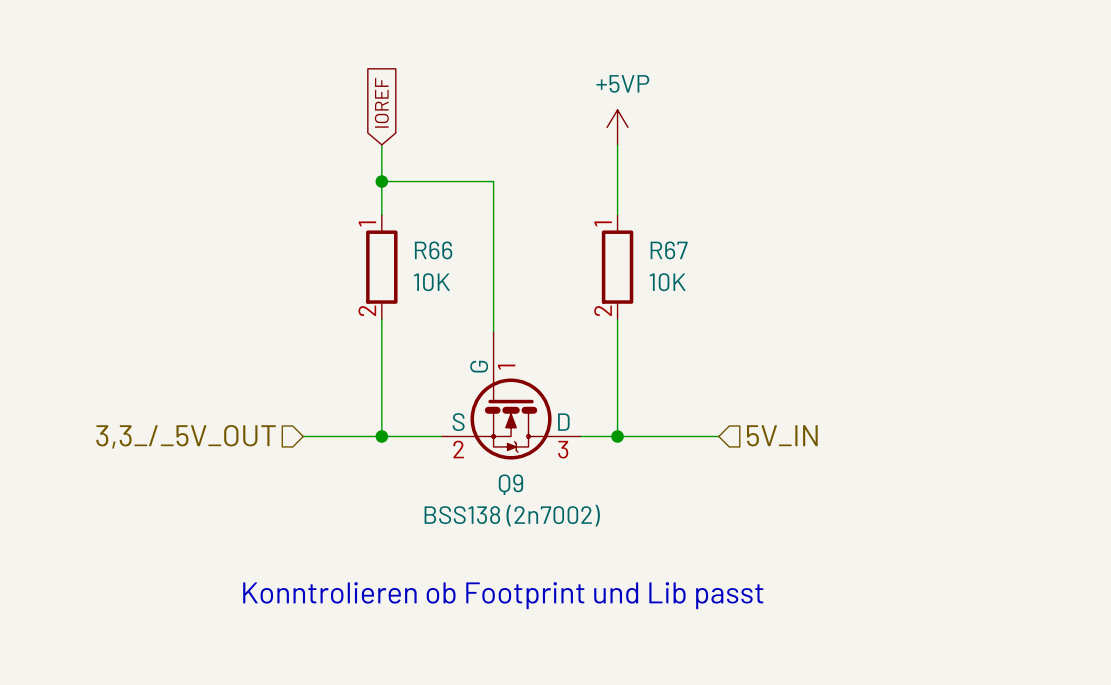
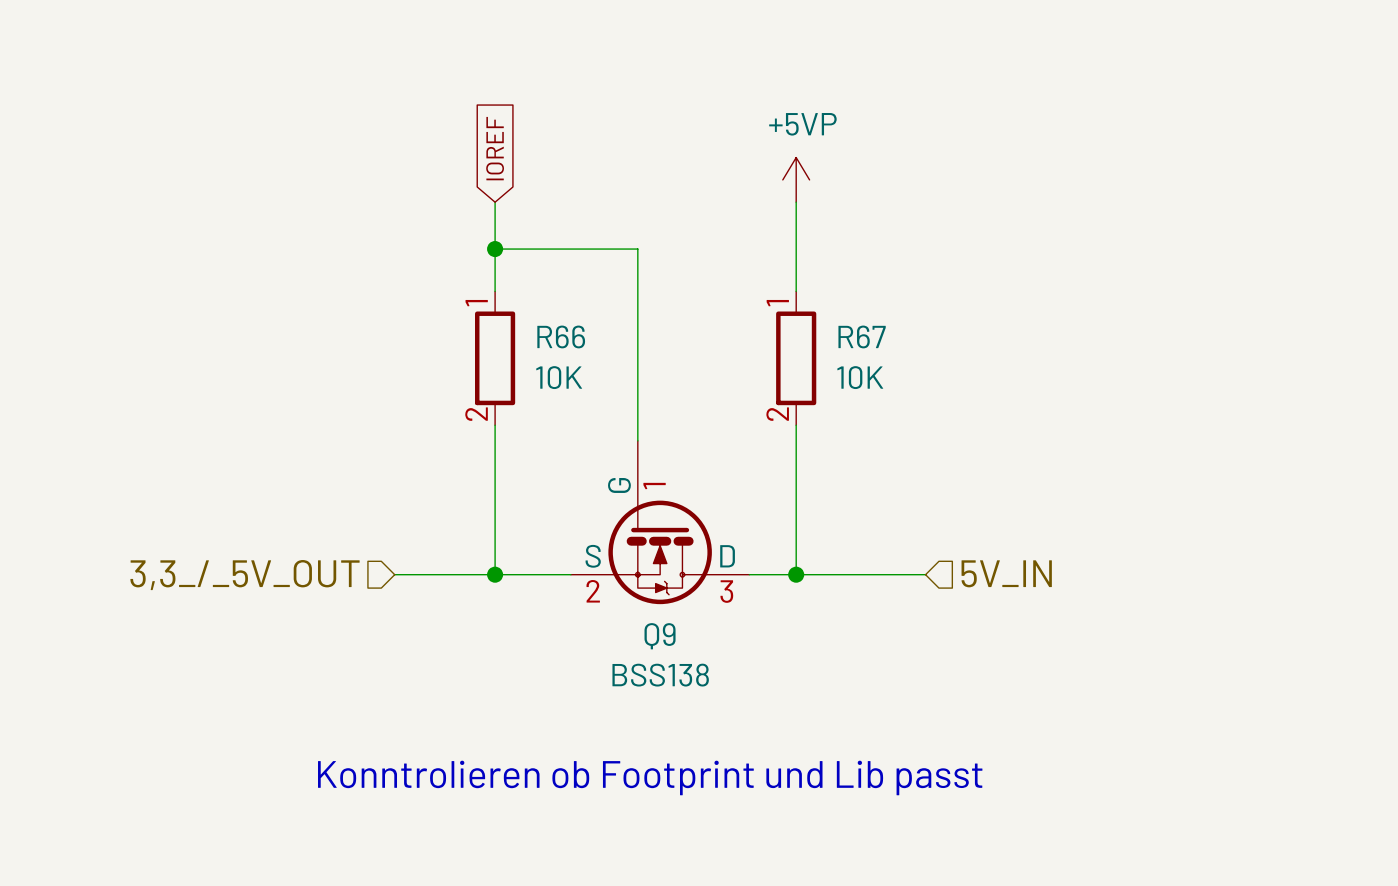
Q9 value: BSS138 (2n7002) (512, 515) -> BSS138 (660, 675)

